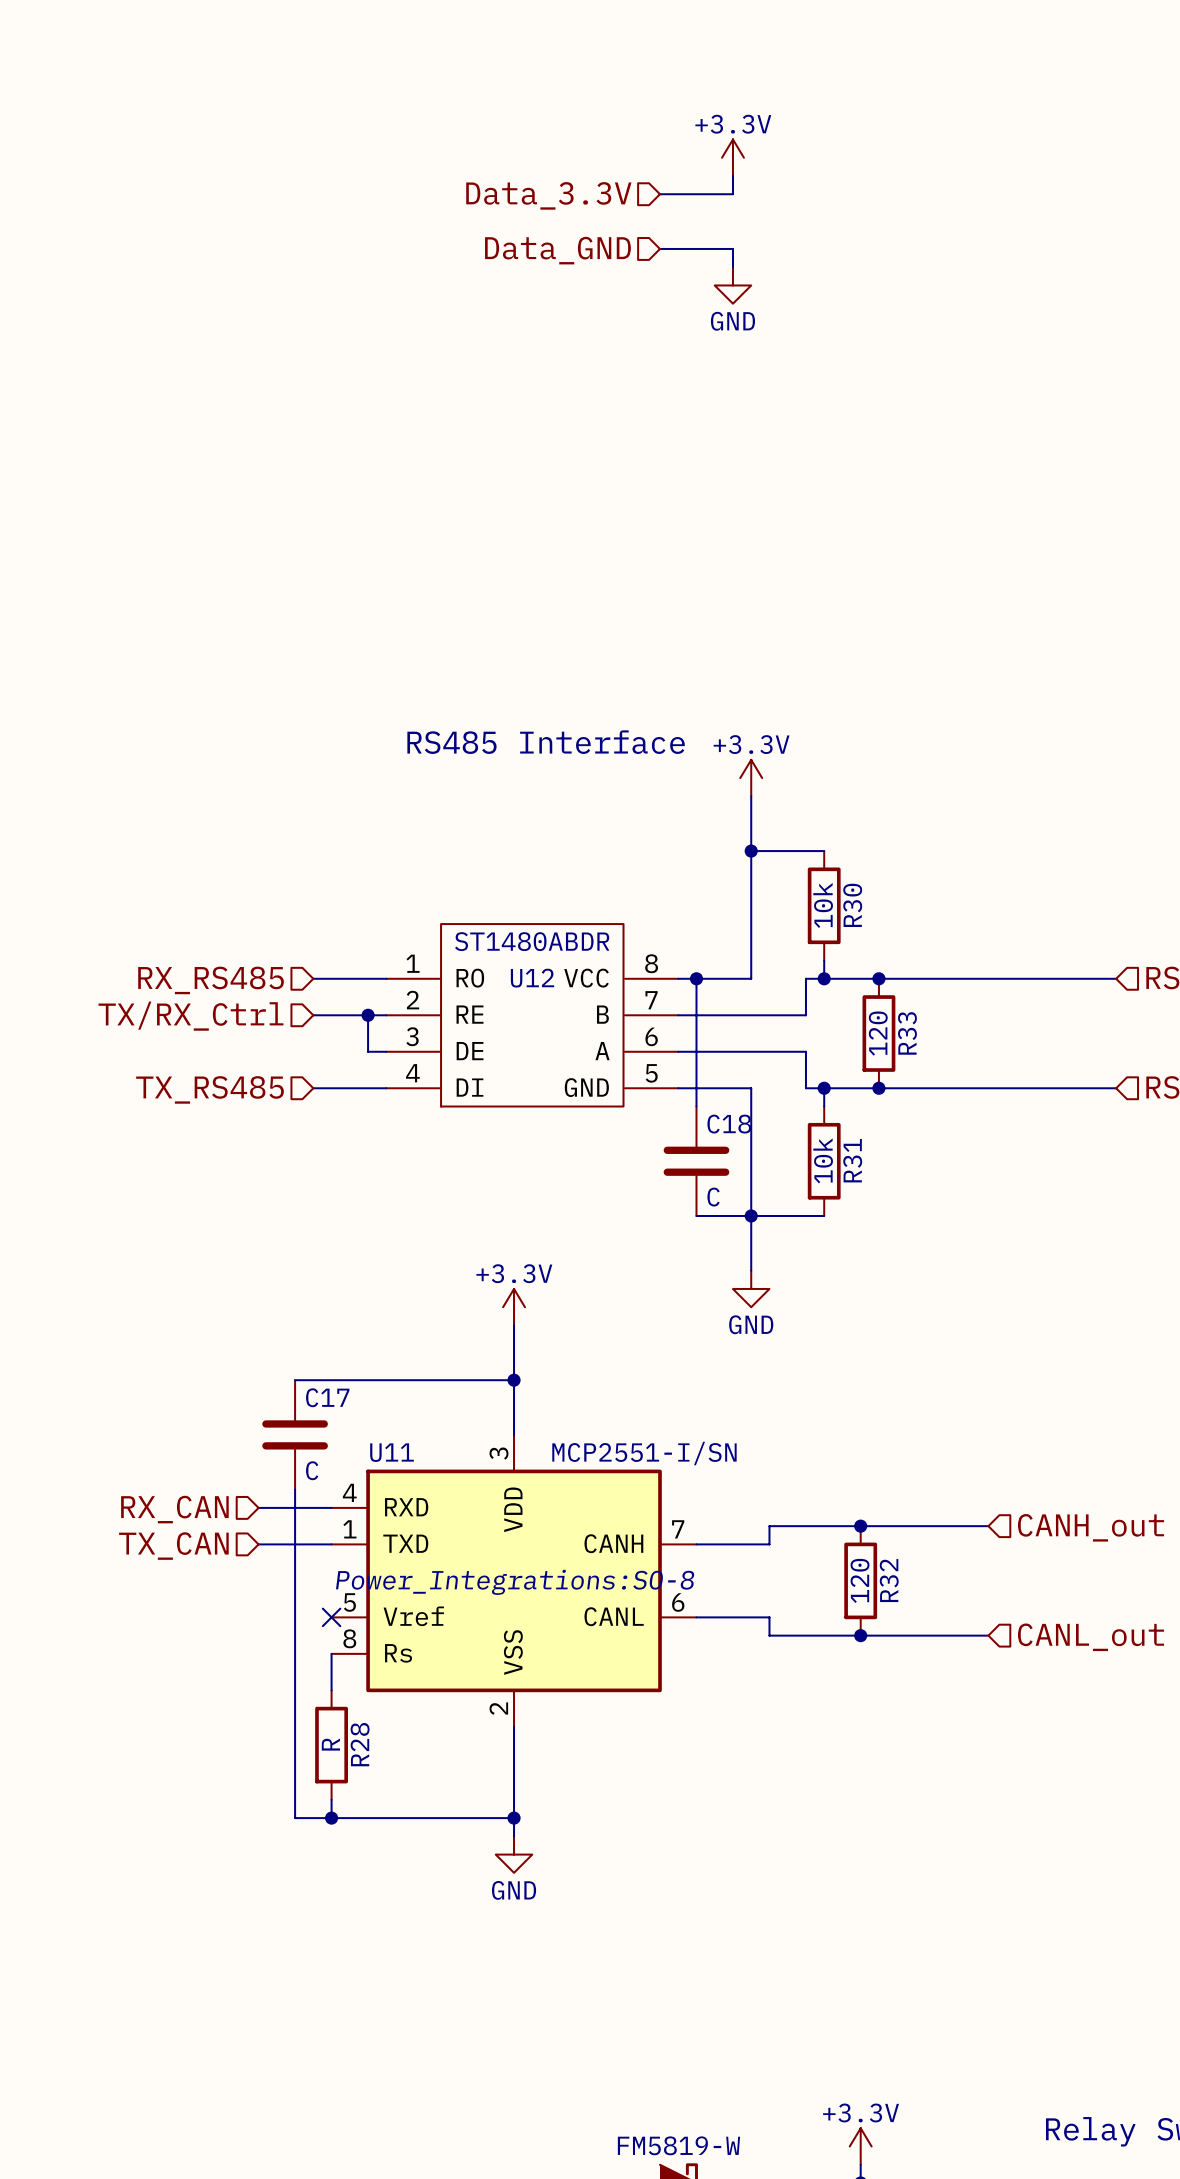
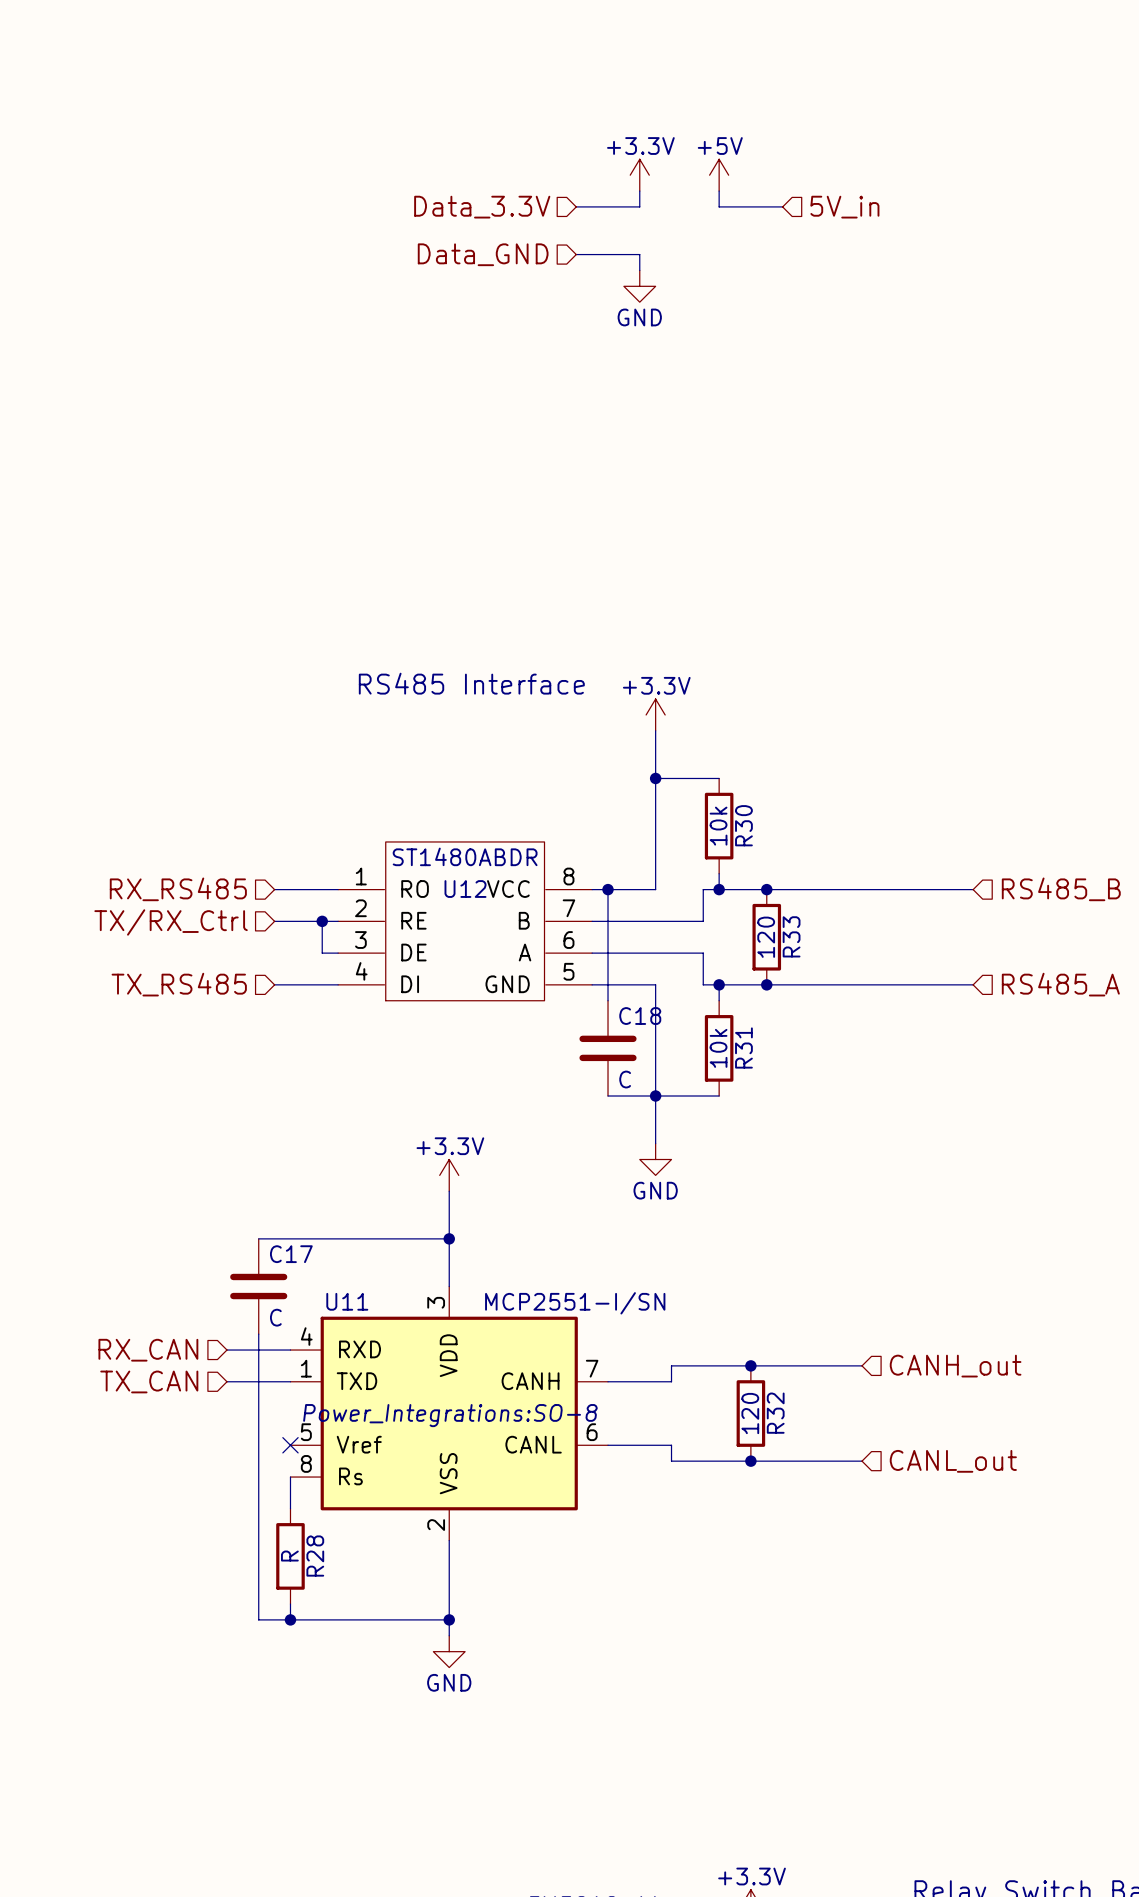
power symbol: none -> +5V (719, 175)
wire: none -> (719, 191) (719, 206) (782, 206)
hierarchical label: none -> 5V_in (844, 207)

